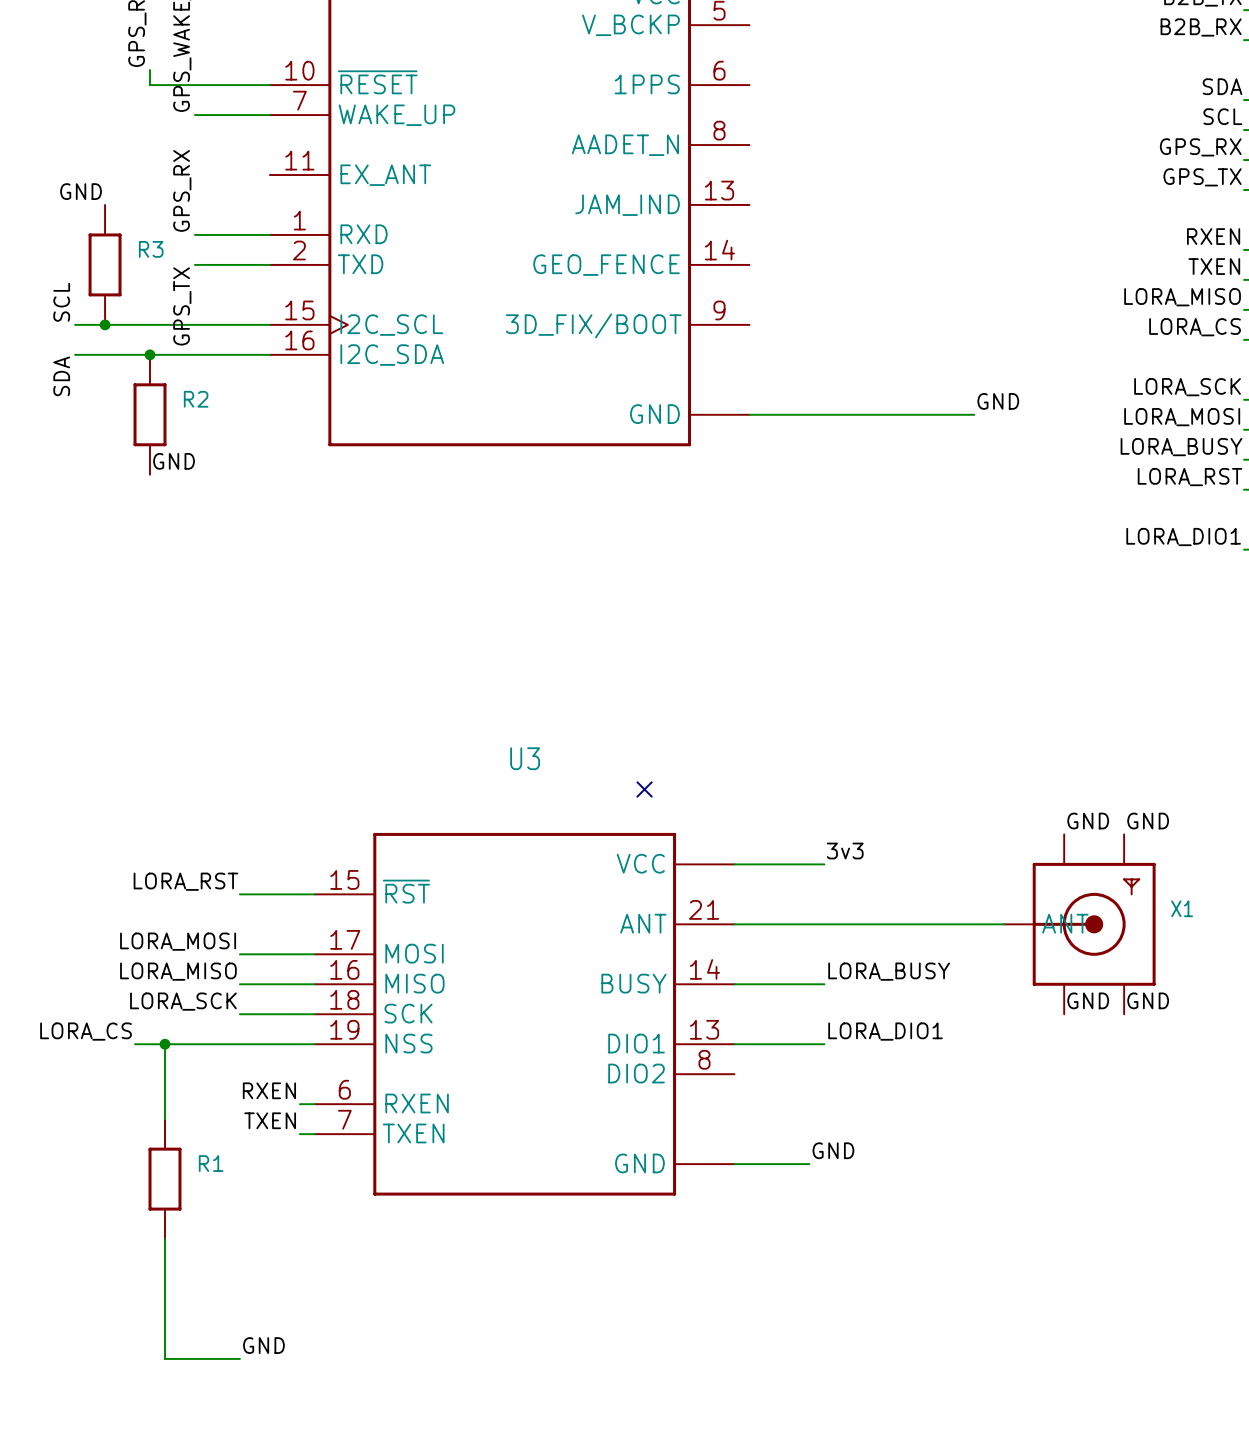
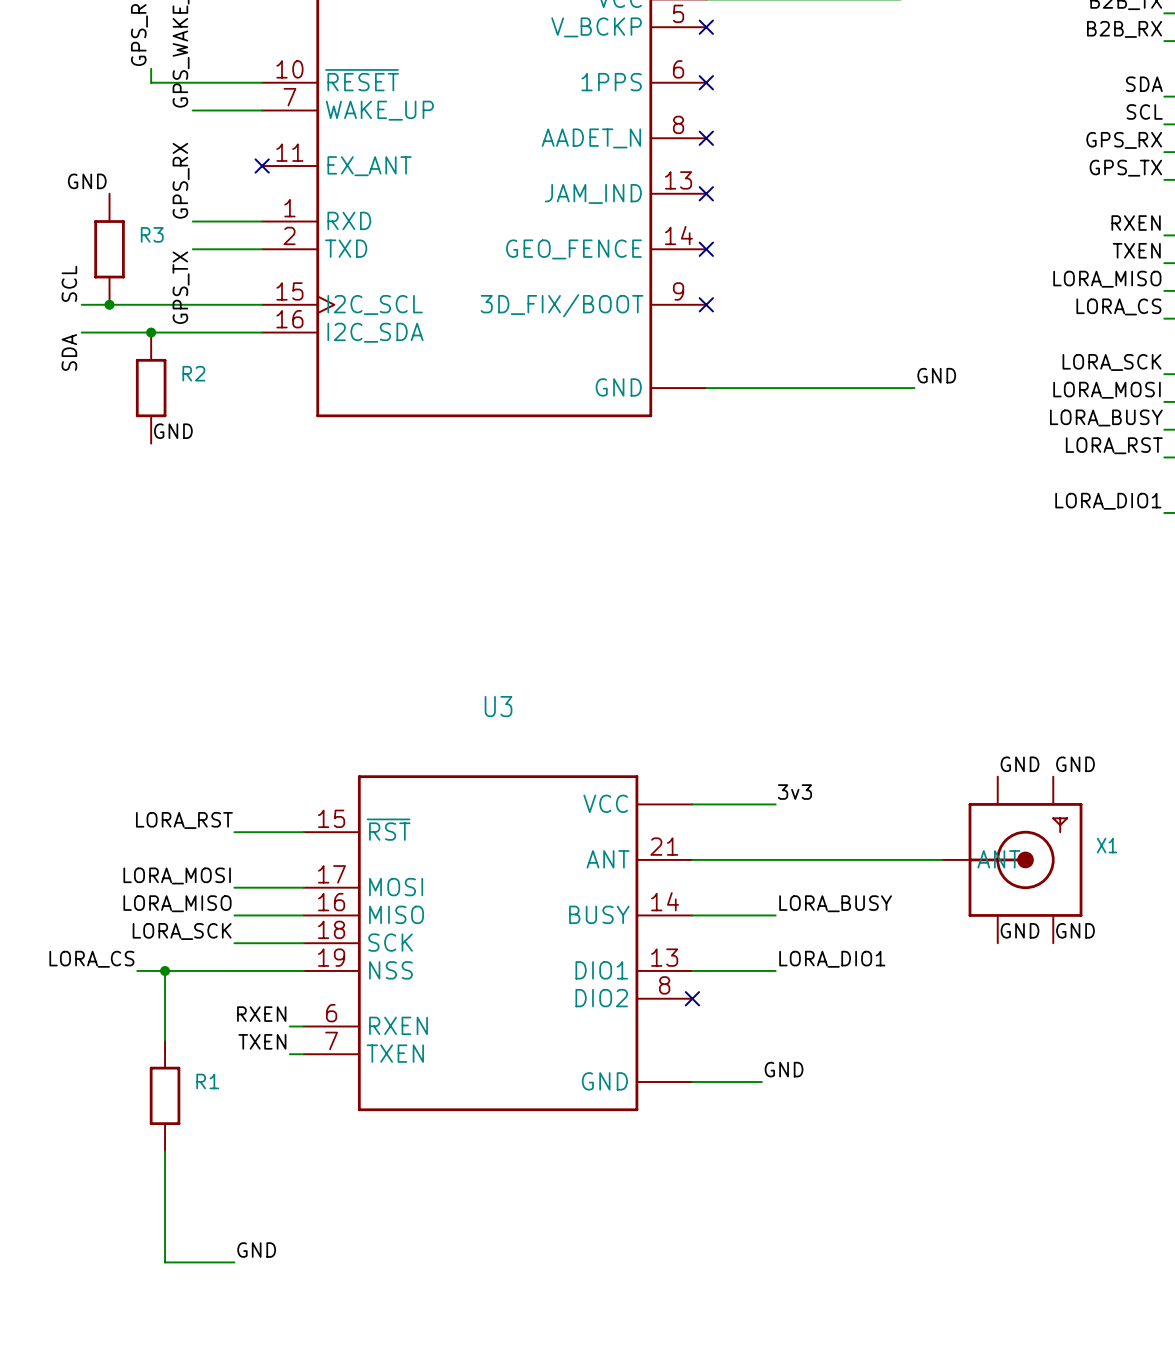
no-connect mark: none -> (706, 27)
no-connect mark: none -> (706, 82)
no-connect mark: none -> (706, 138)
no-connect mark: none -> (262, 166)
no-connect mark: none -> (706, 193)
no-connect mark: none -> (706, 249)
no-connect mark: none -> (706, 304)
no-connect mark: (644, 789) -> none
no-connect mark: none -> (692, 998)

